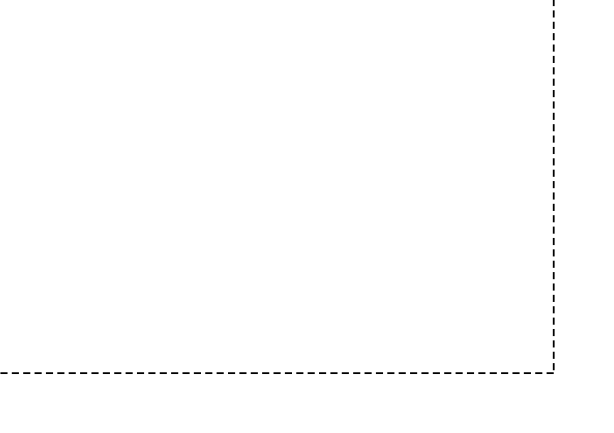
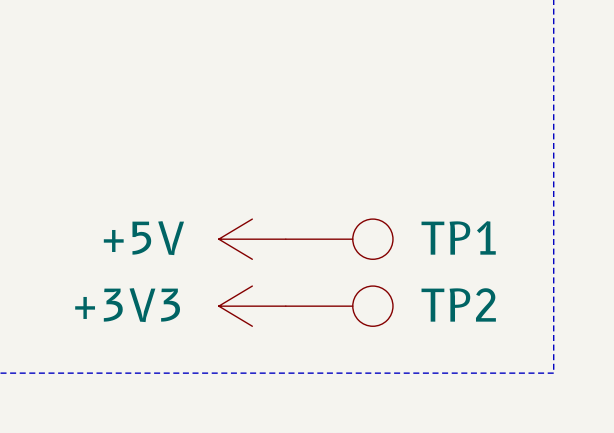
power symbol: none -> +5V (252, 239)
TP1: none -> (339, 239)
power symbol: none -> +3V3 (252, 306)
TP2: none -> (339, 306)

